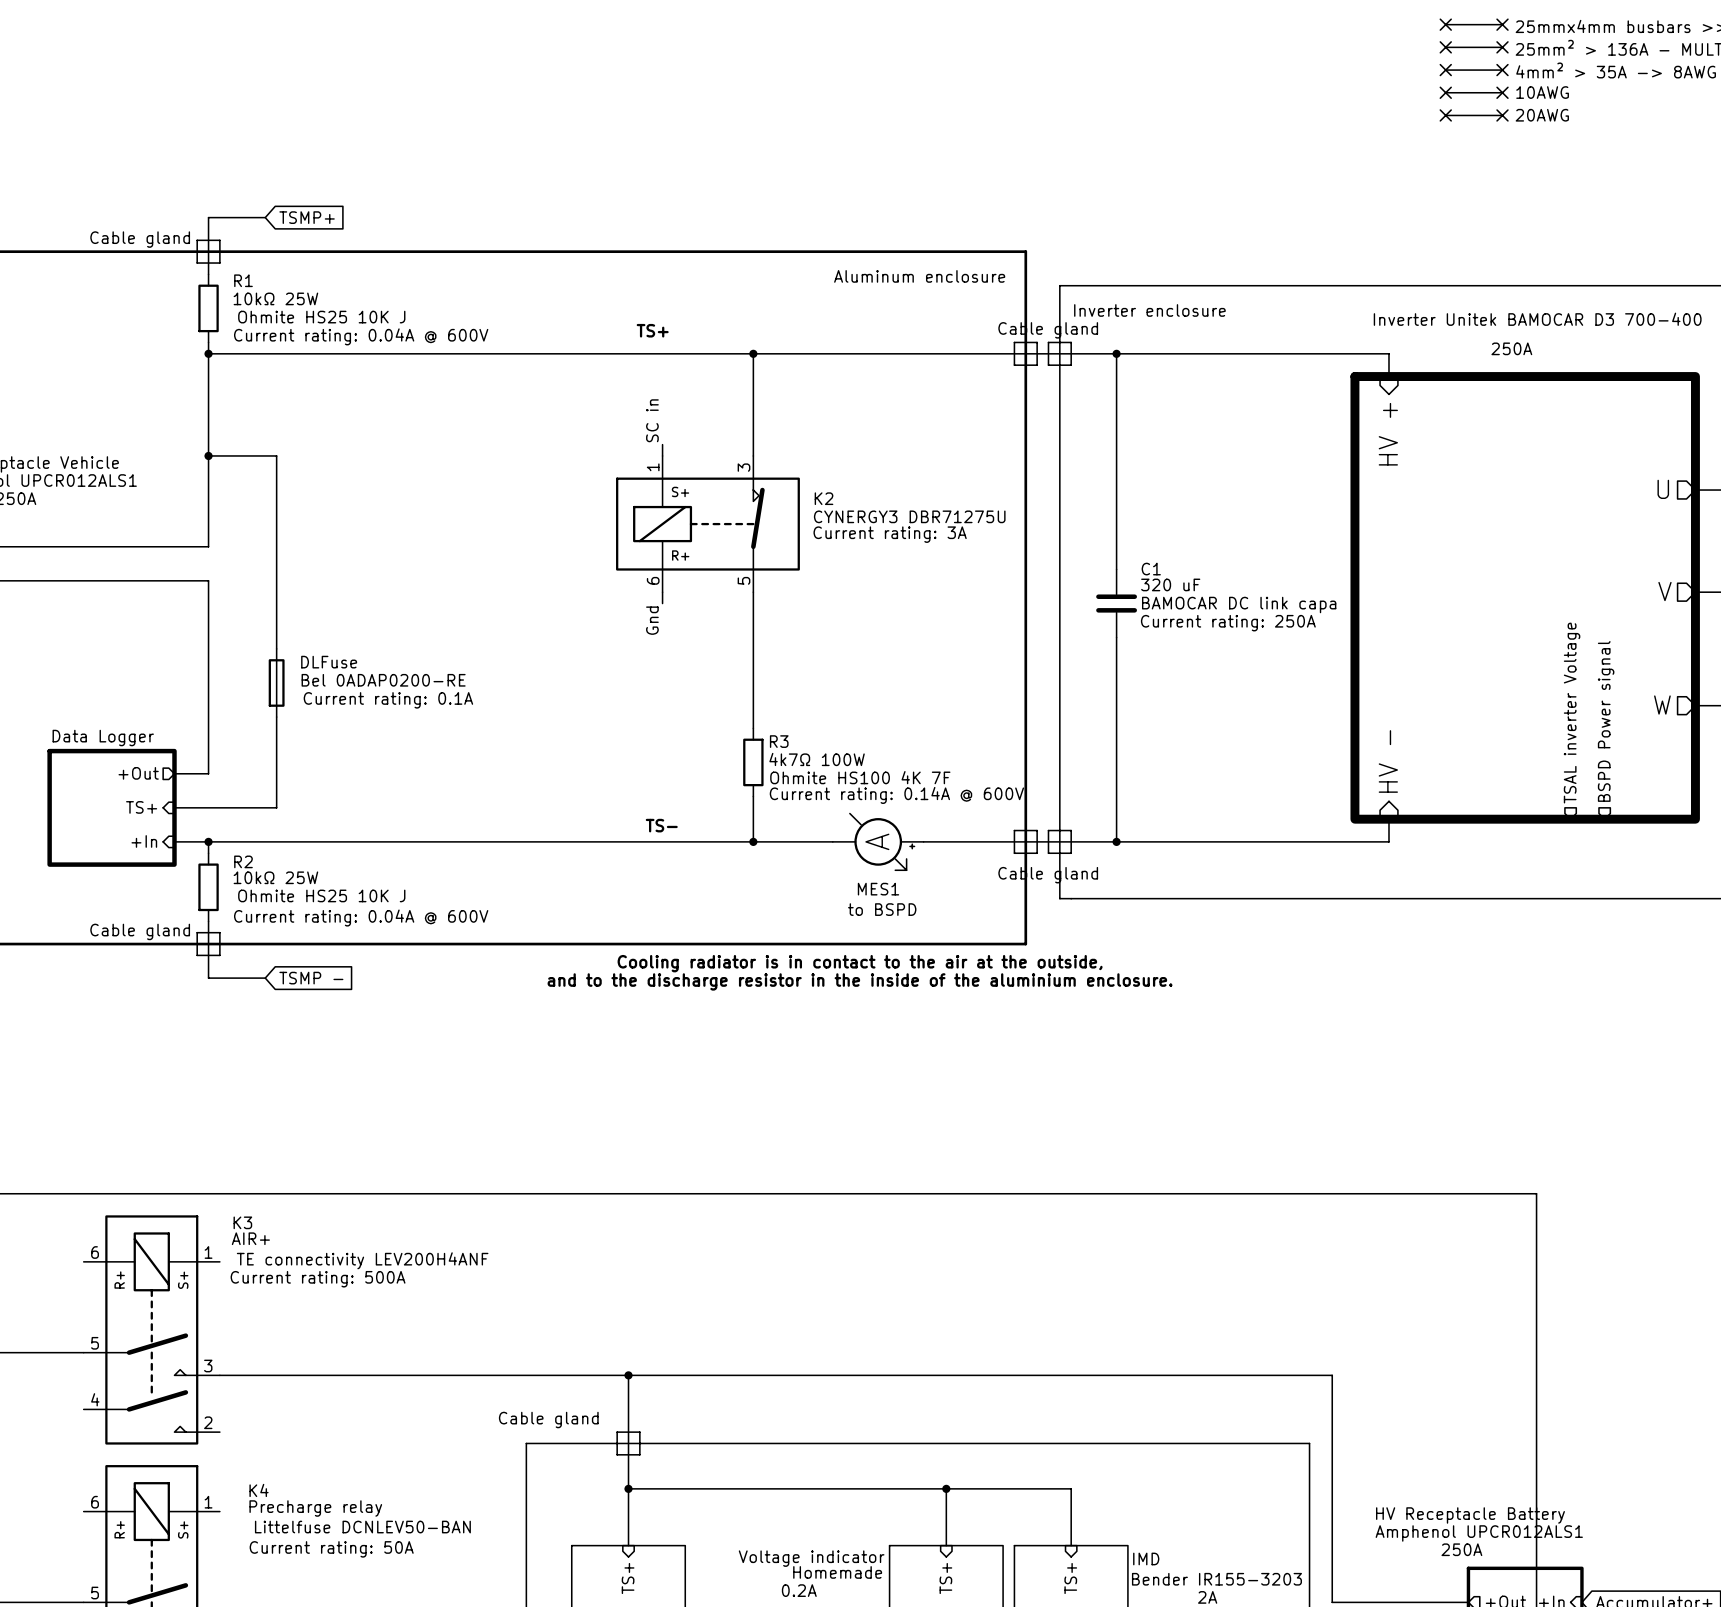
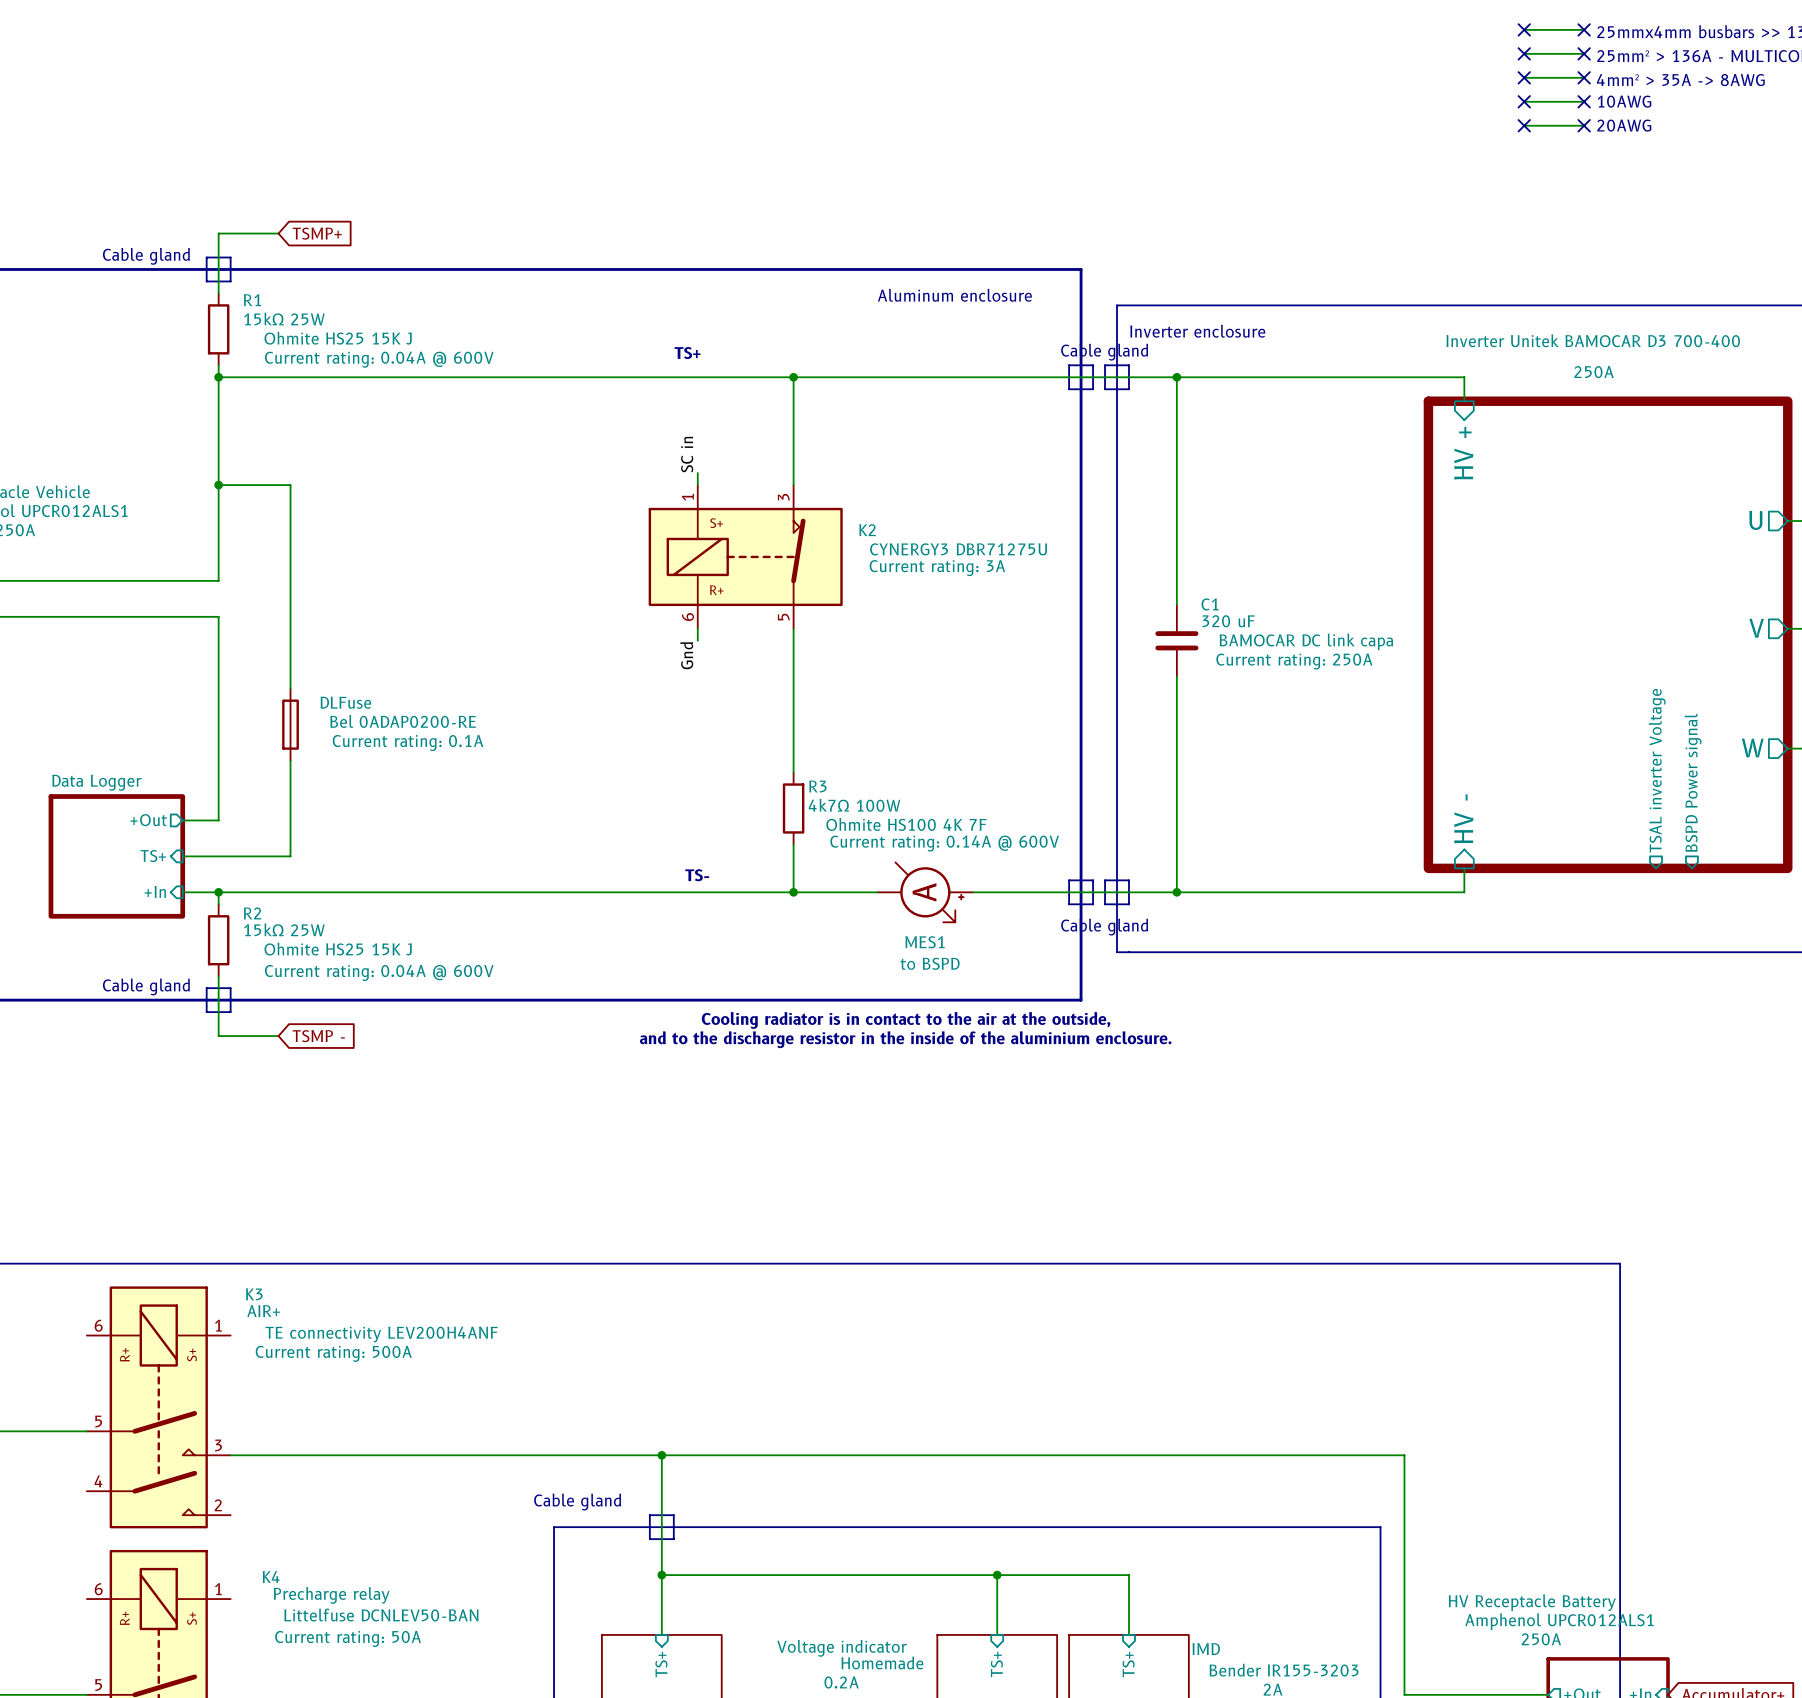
R1 value: 10kΩ 25W (275, 298) -> 15kΩ 25W (284, 318)
R1 text: Ohmite HS25 10K J (321, 317) -> Ohmite HS25 15K J (338, 338)
R2 value: 10kΩ 25W (275, 877) -> 15kΩ 25W (284, 929)
R2 text: Ohmite HS25 10K J (321, 895) -> Ohmite HS25 15K J (338, 949)

